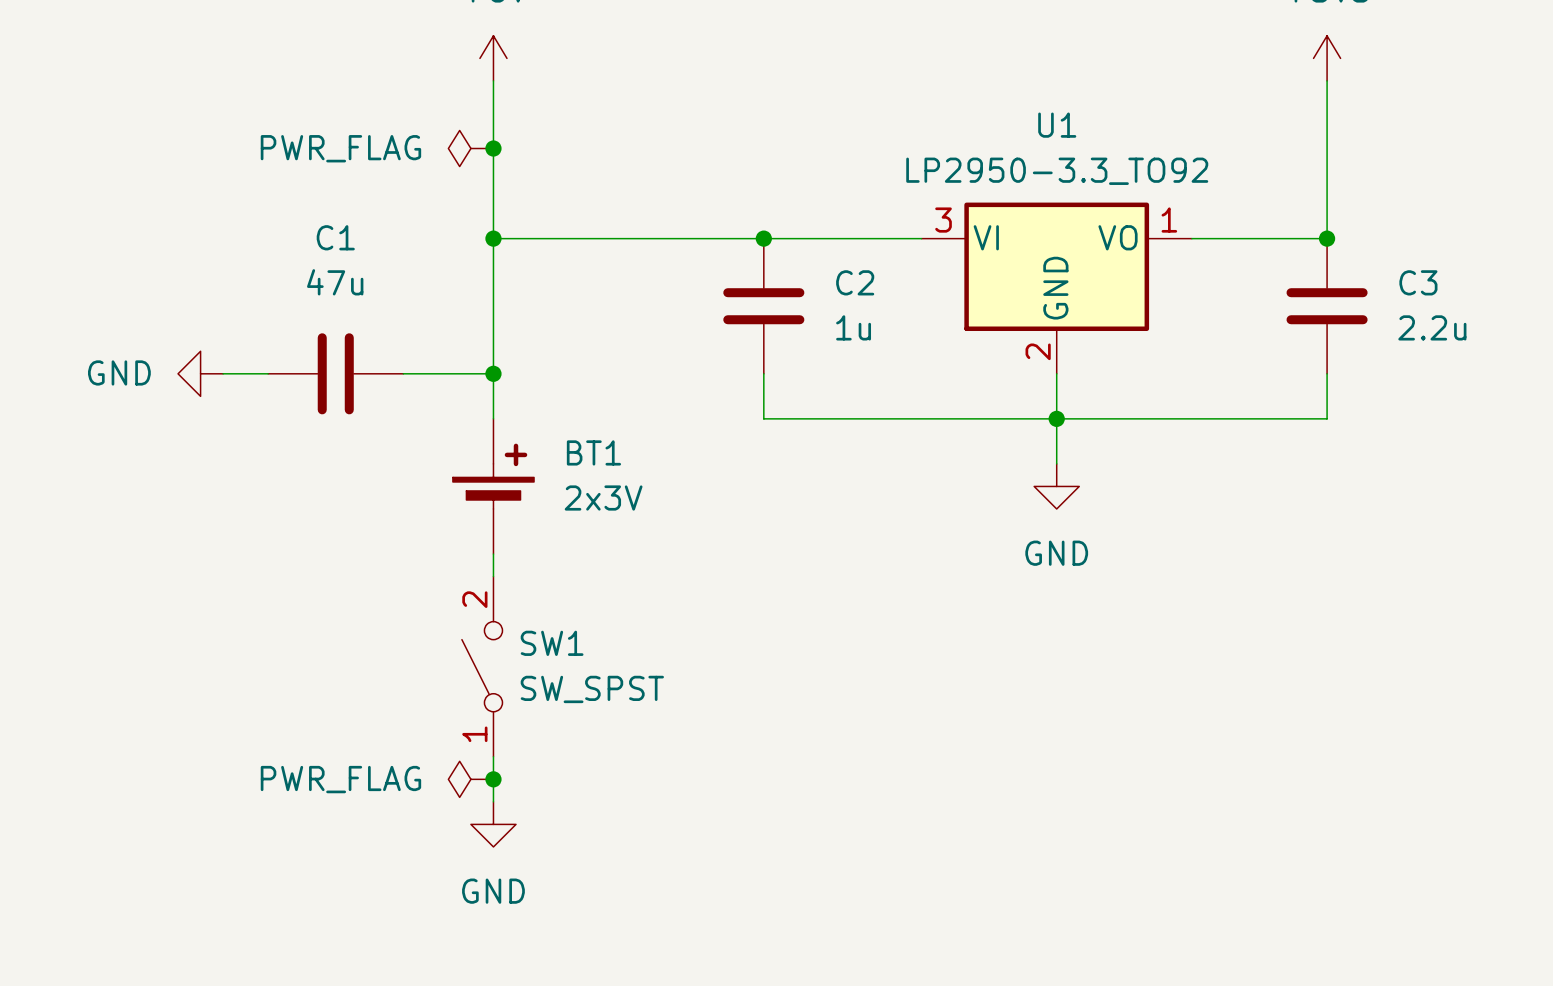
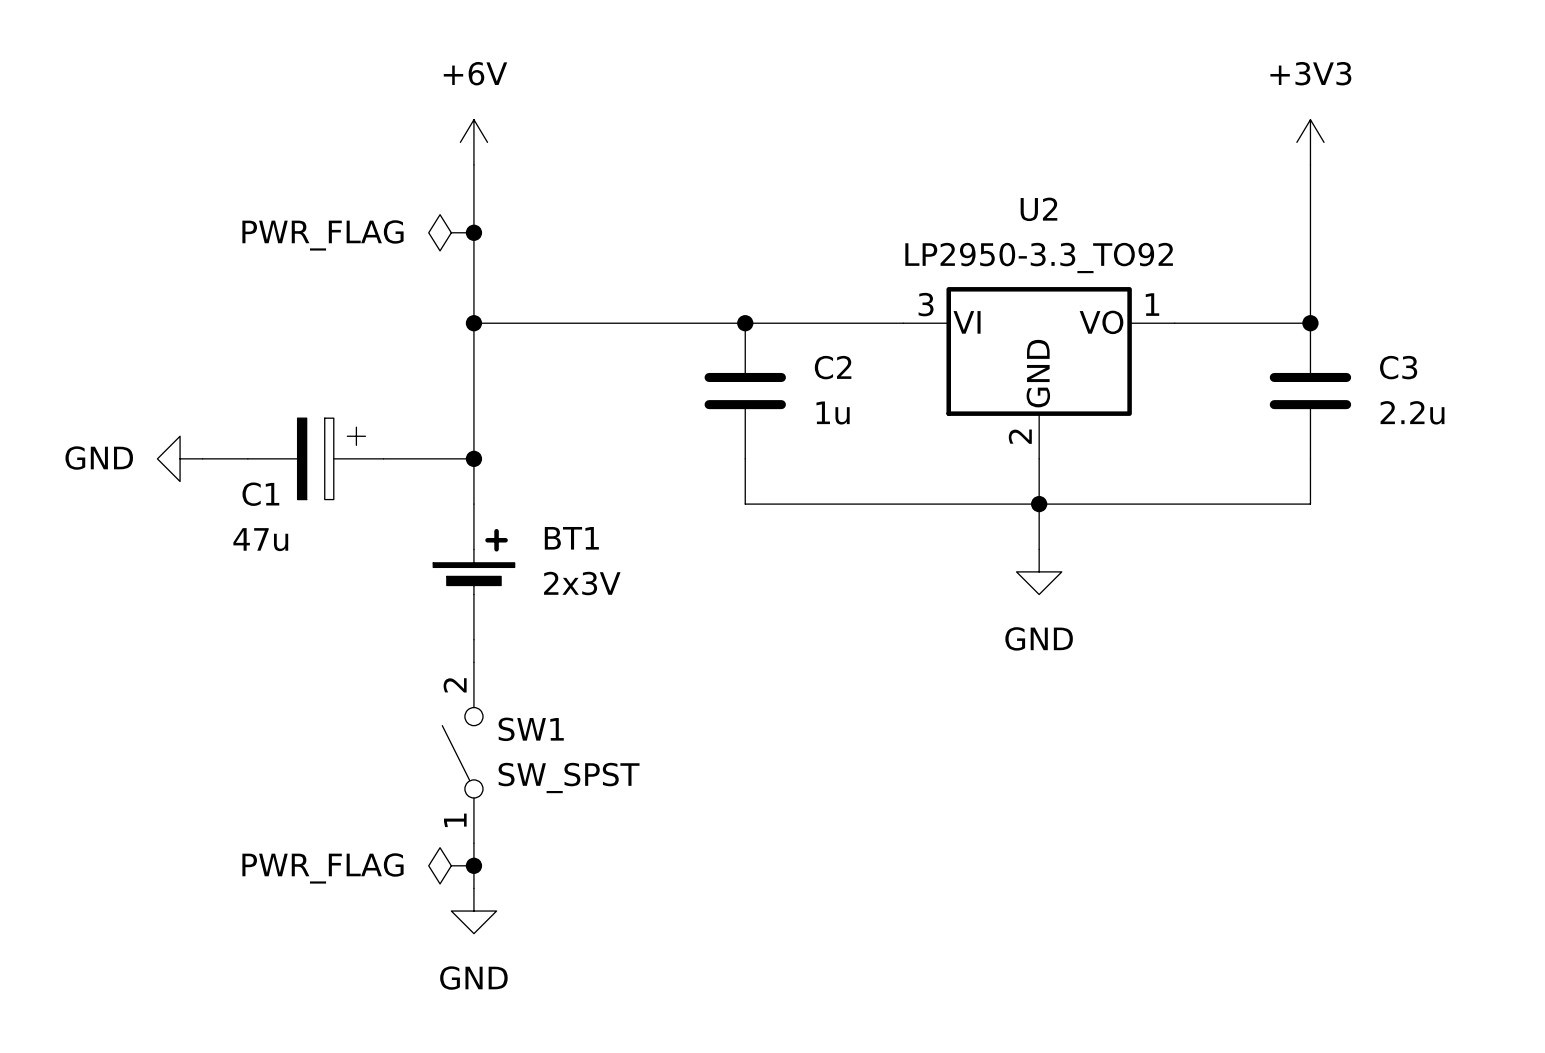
U1 name: U1 (1057, 125) -> U2 (1038, 209)
C1 name position: C1 (335, 237) -> C1 (260, 494)
C1 value position: 47u (335, 282) -> 47u (260, 539)
C1 symbol: [268, 333, 404, 415] -> [247, 418, 384, 500]

